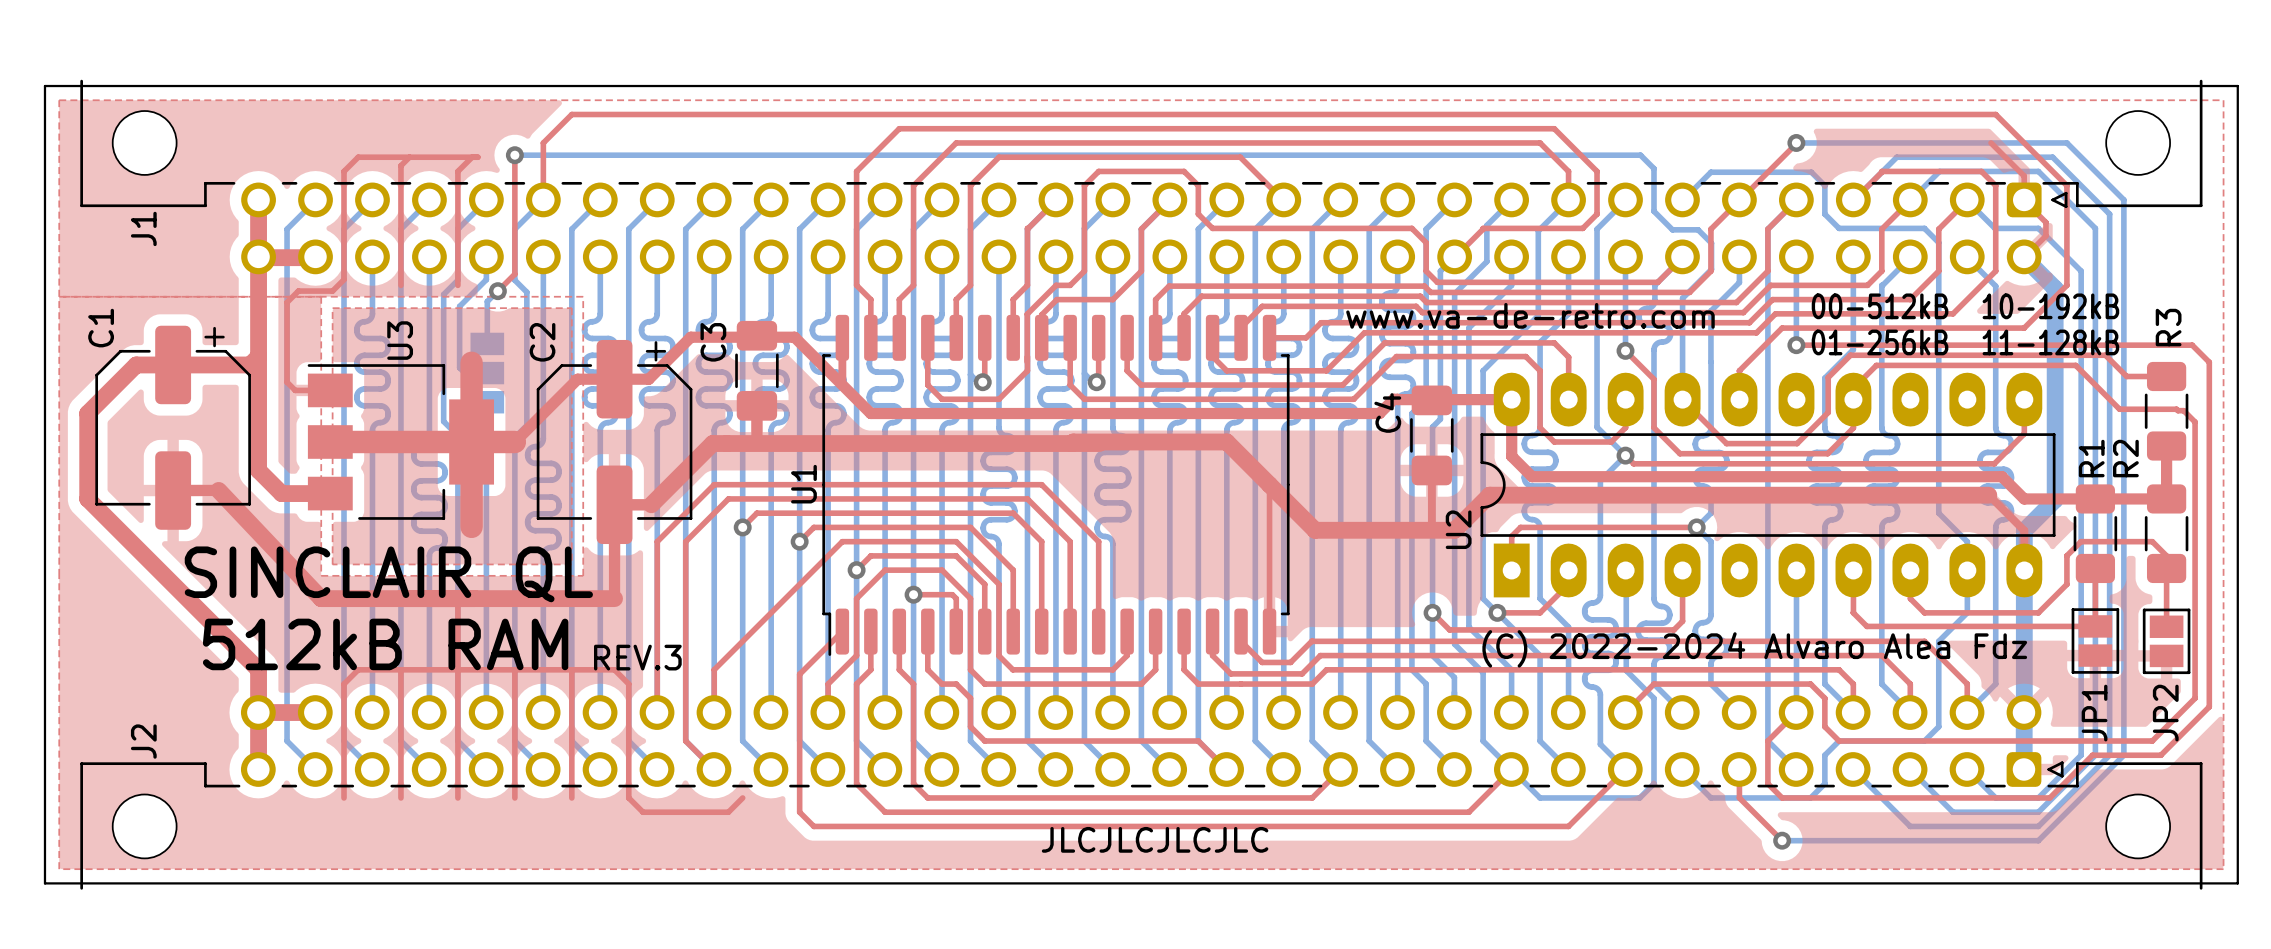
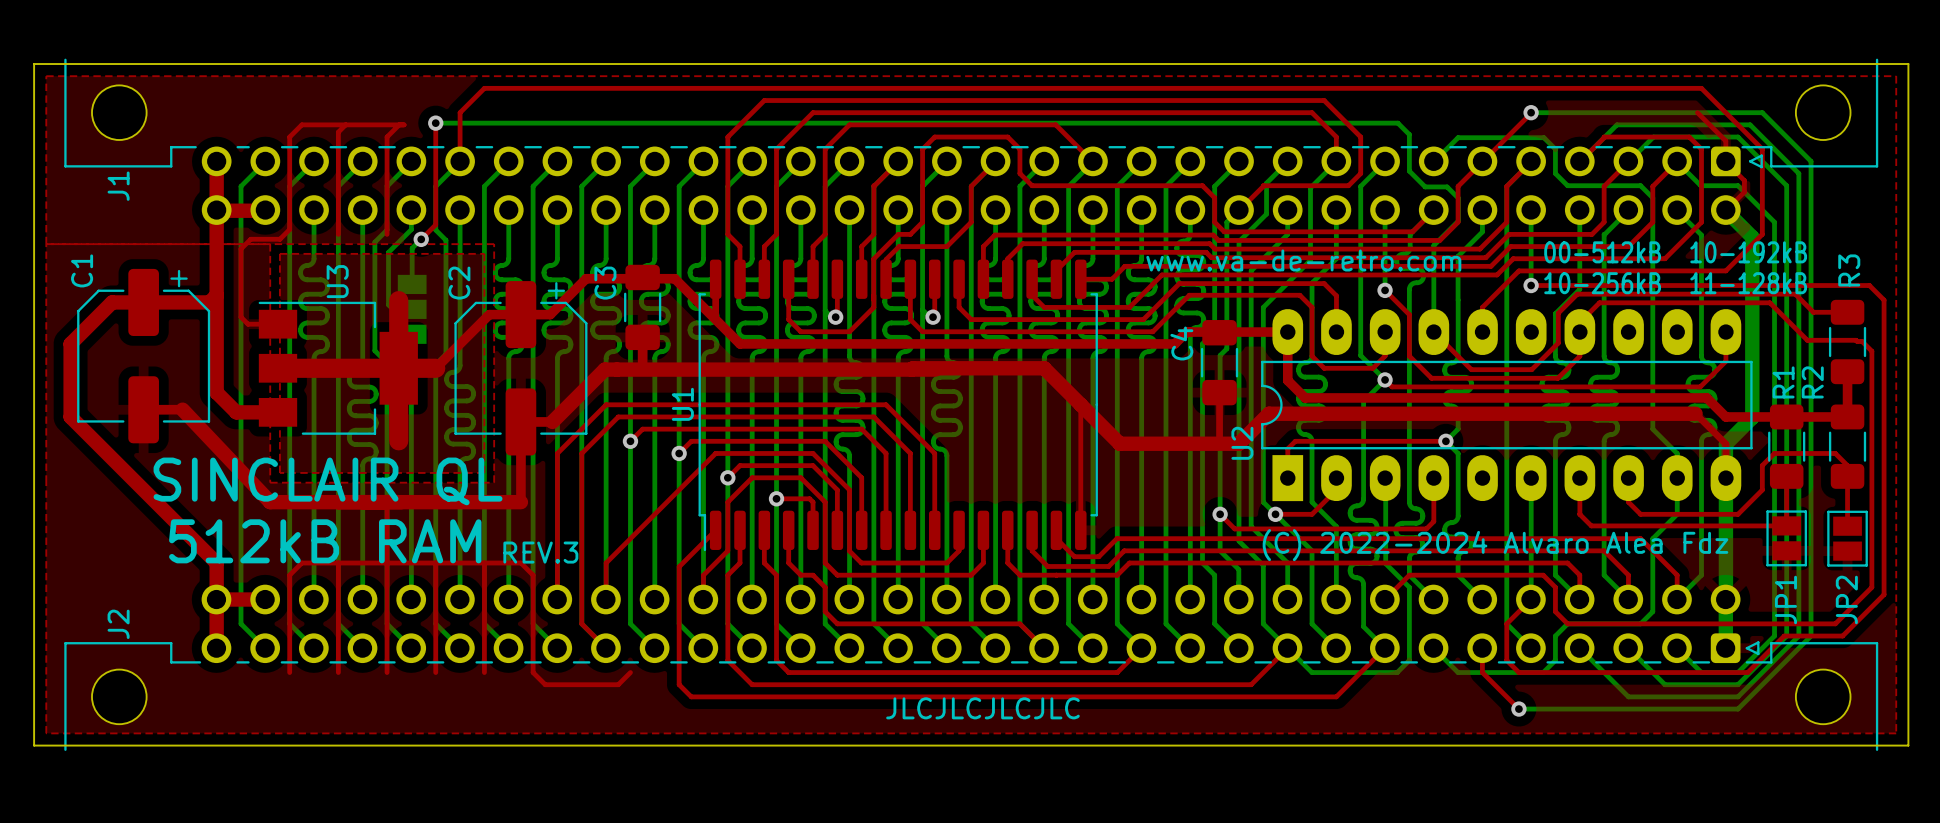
text: 01-256kB (1880, 342) -> 10-256kB (1602, 283)

